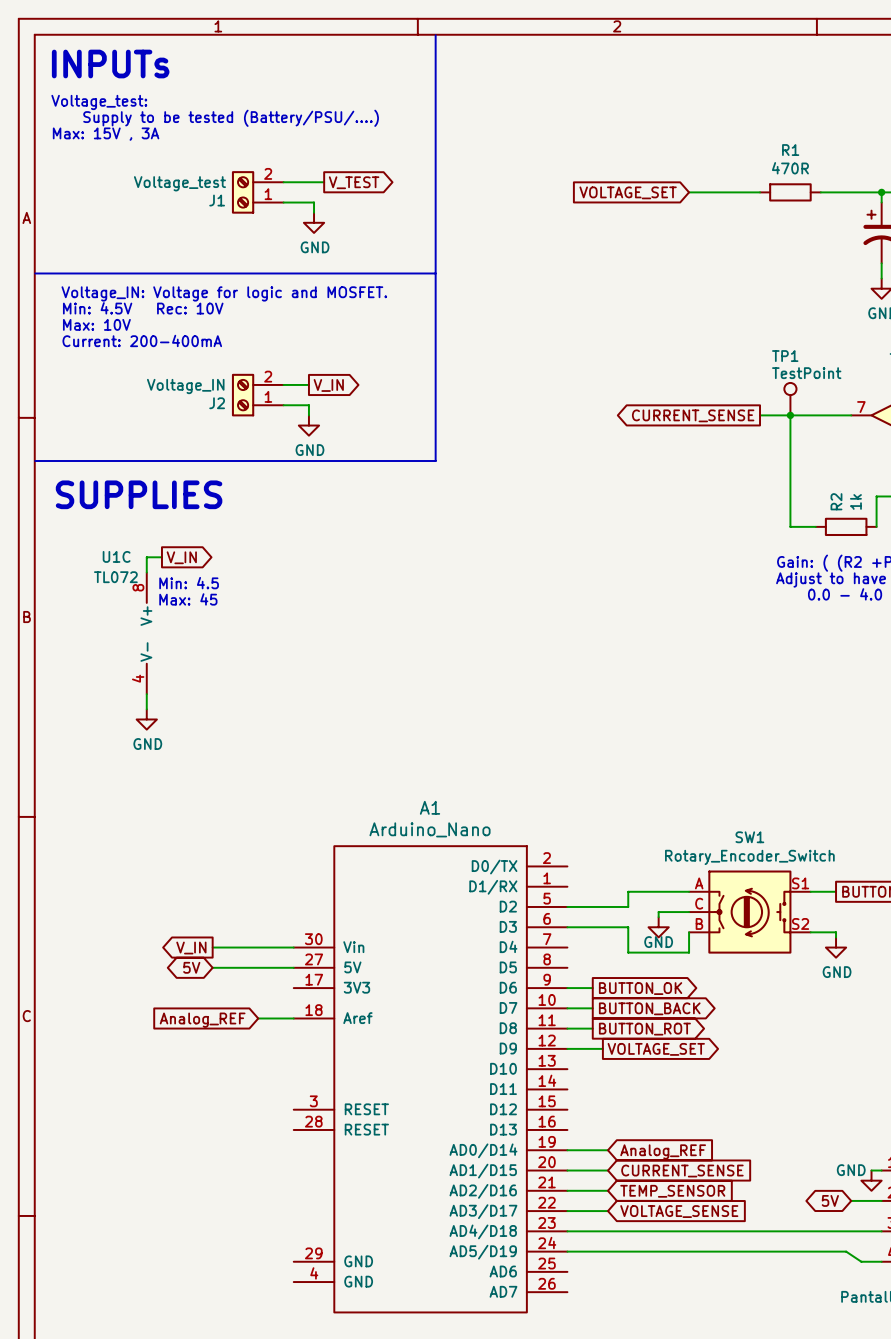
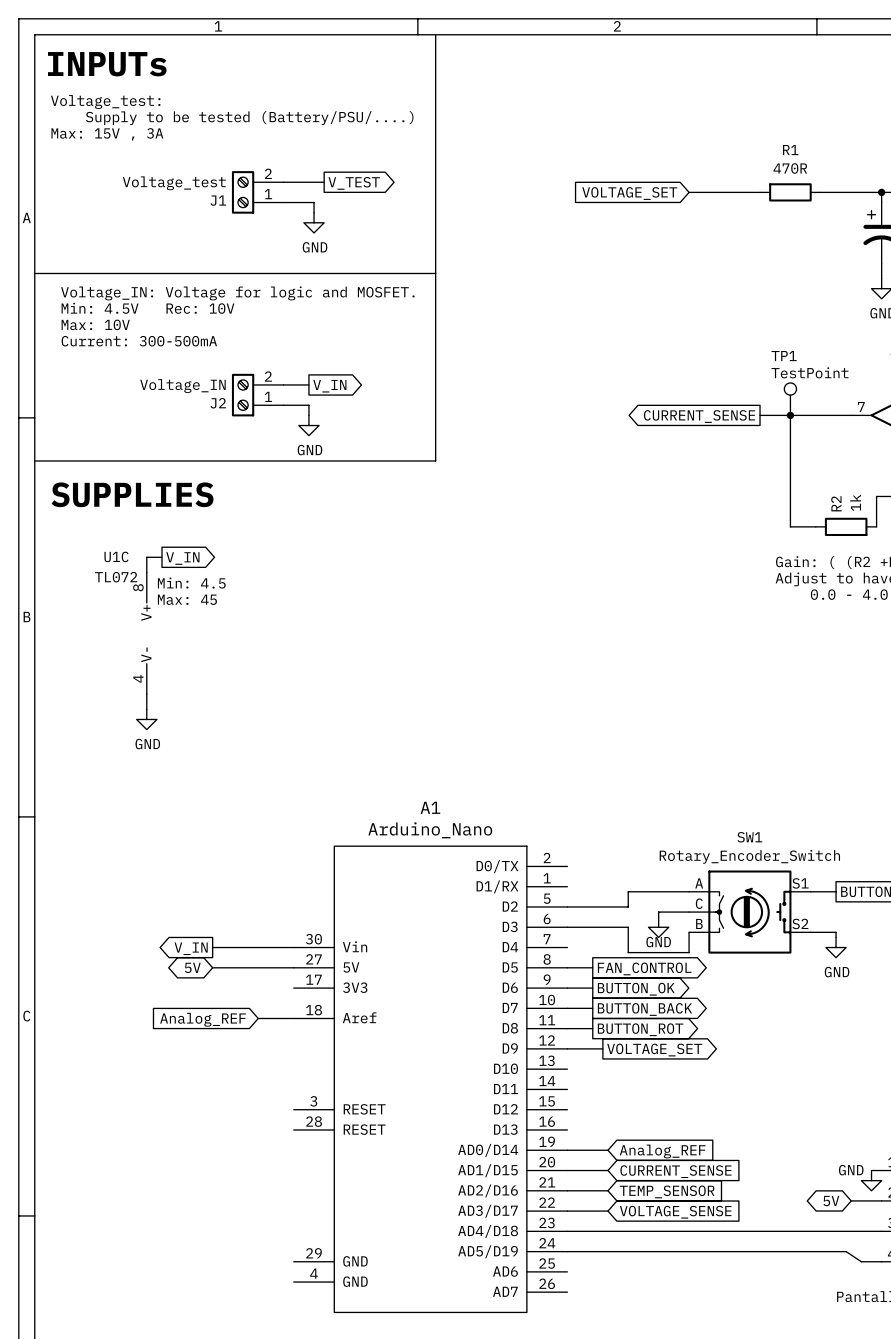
text: Current: 200-400mA (142, 340) -> Current: 300-500mA (139, 341)
wire: none -> (567, 967) (592, 967)
global label: none -> FAN_CONTROL (644, 968)

